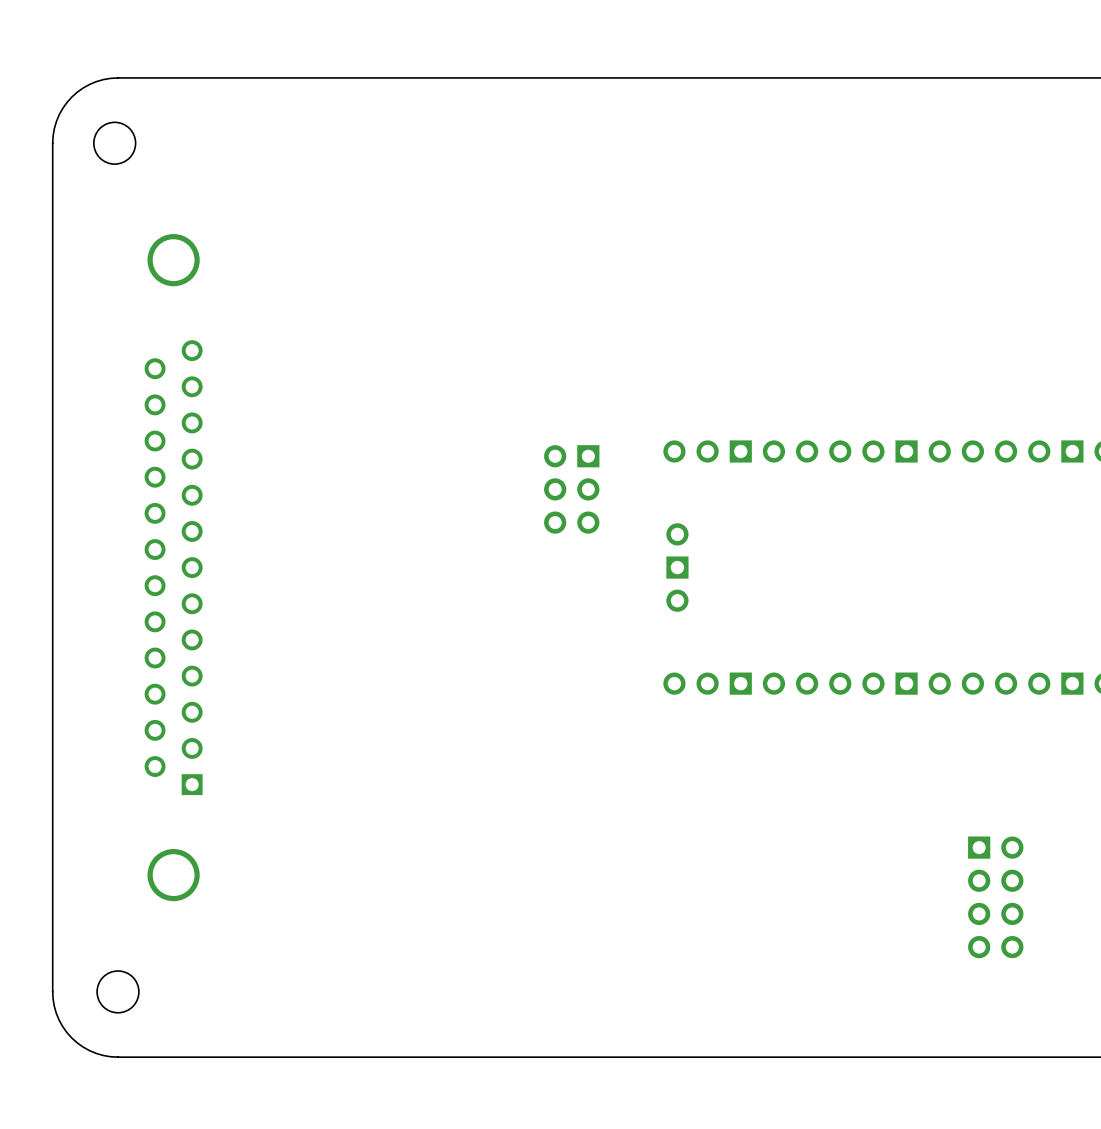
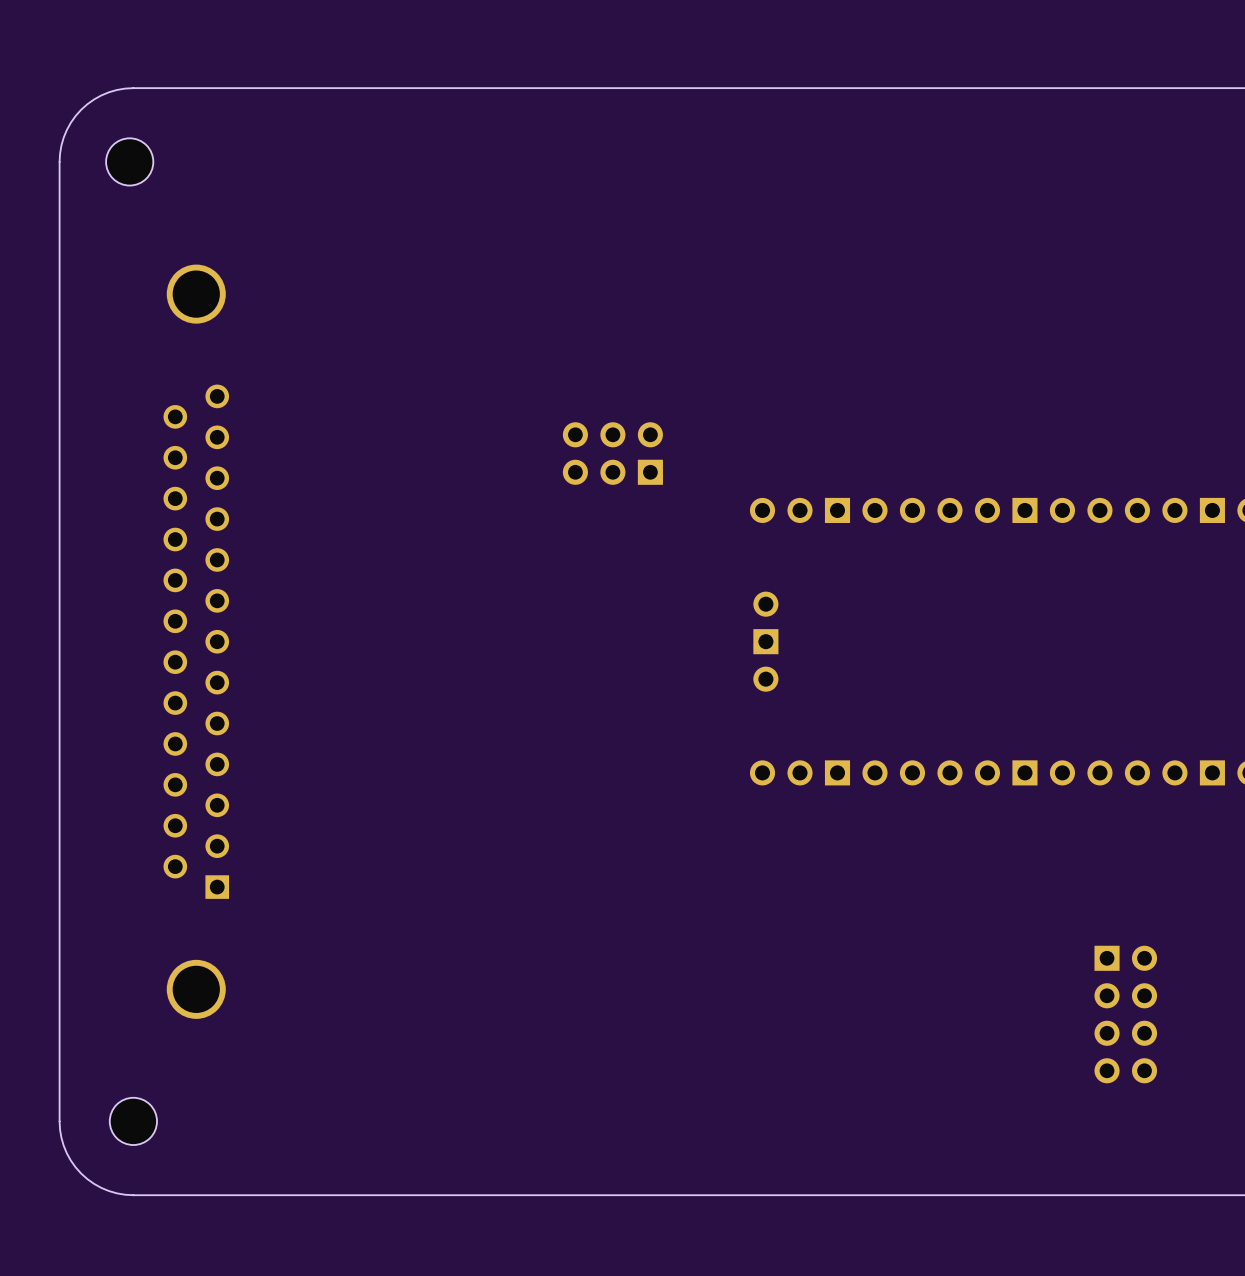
part rotation: 0° (571, 489) -> 90° clockwise (612, 453)
part position: (571, 489) -> (612, 453)

